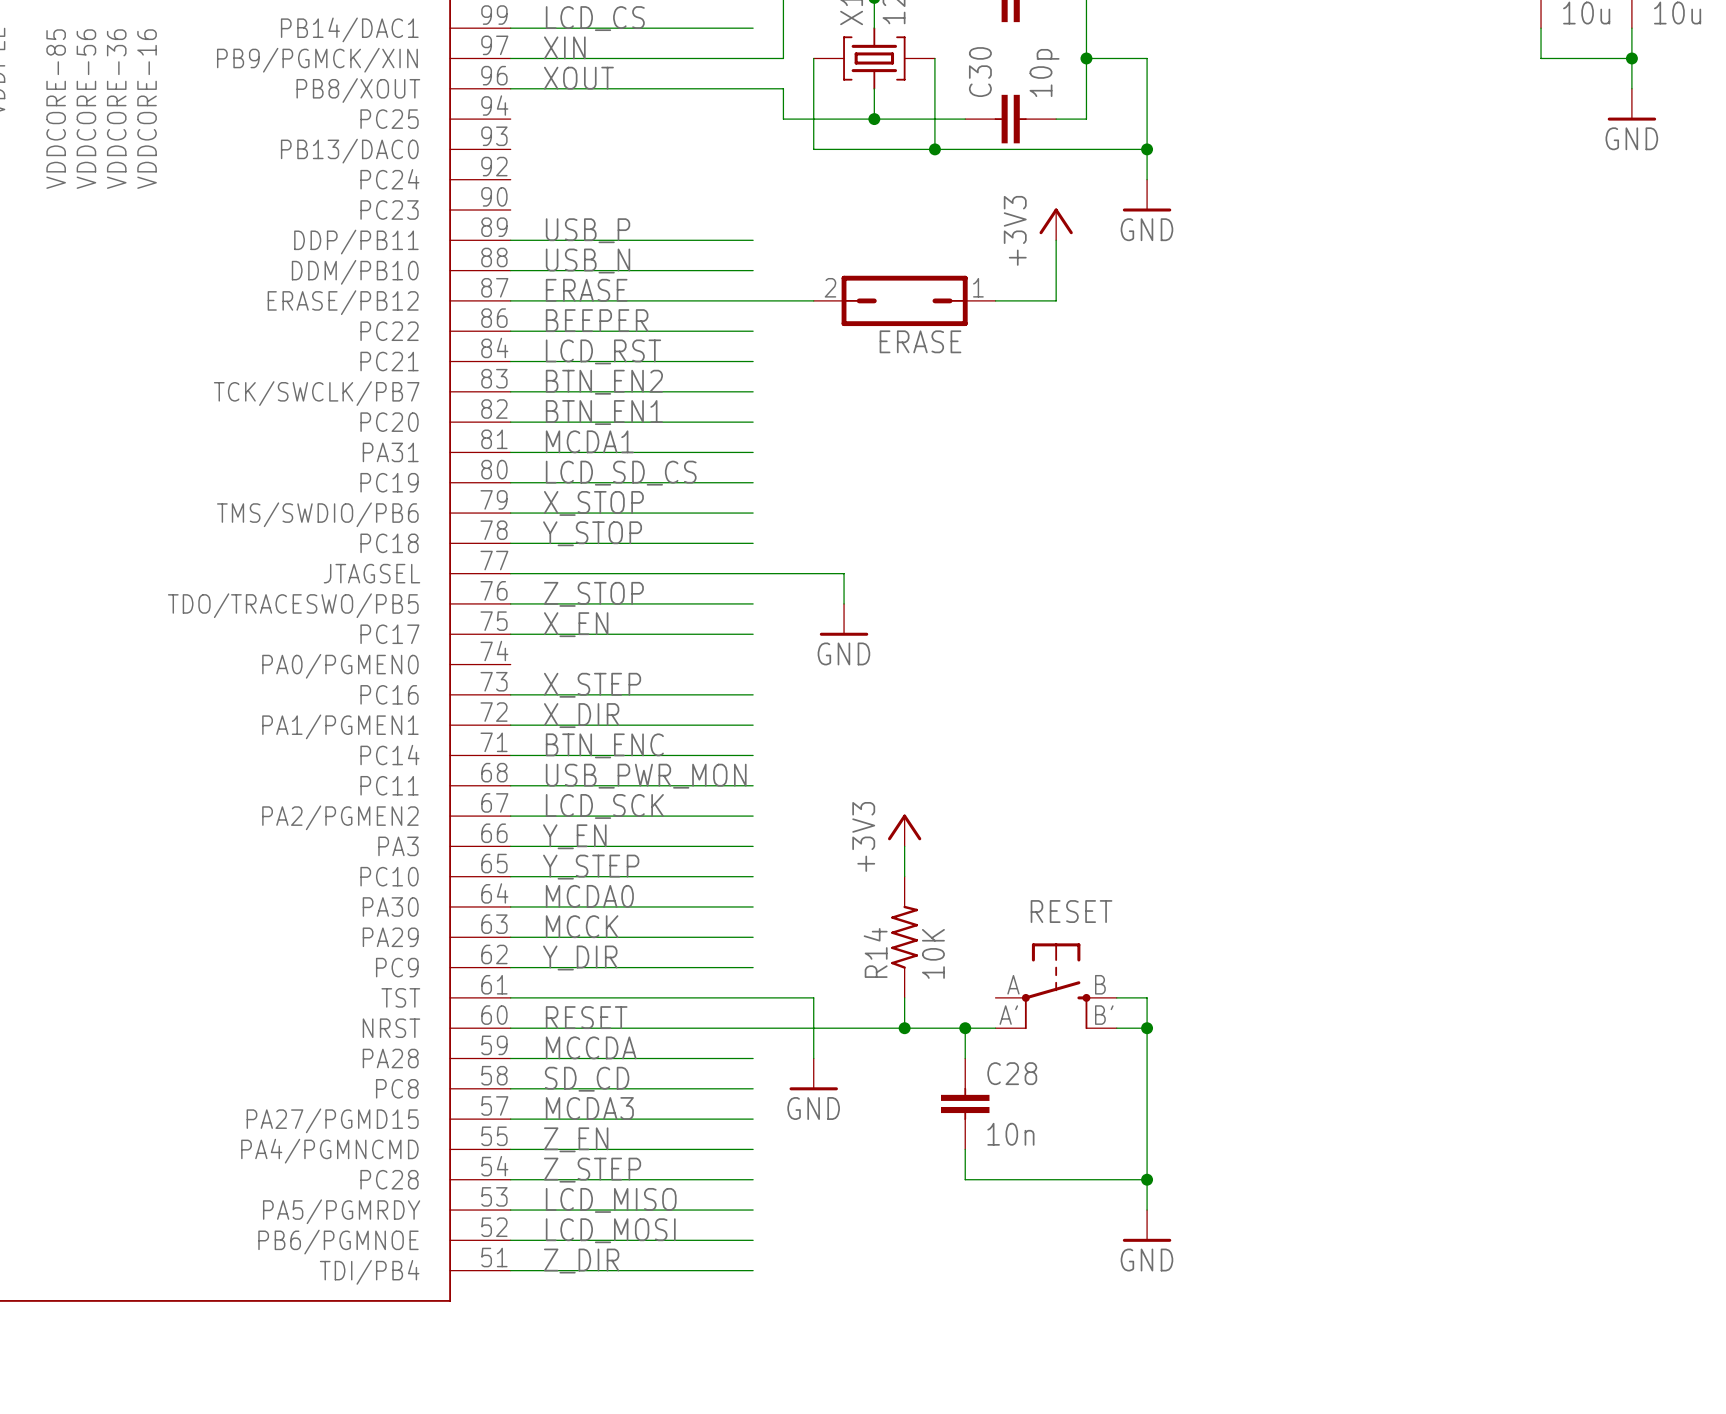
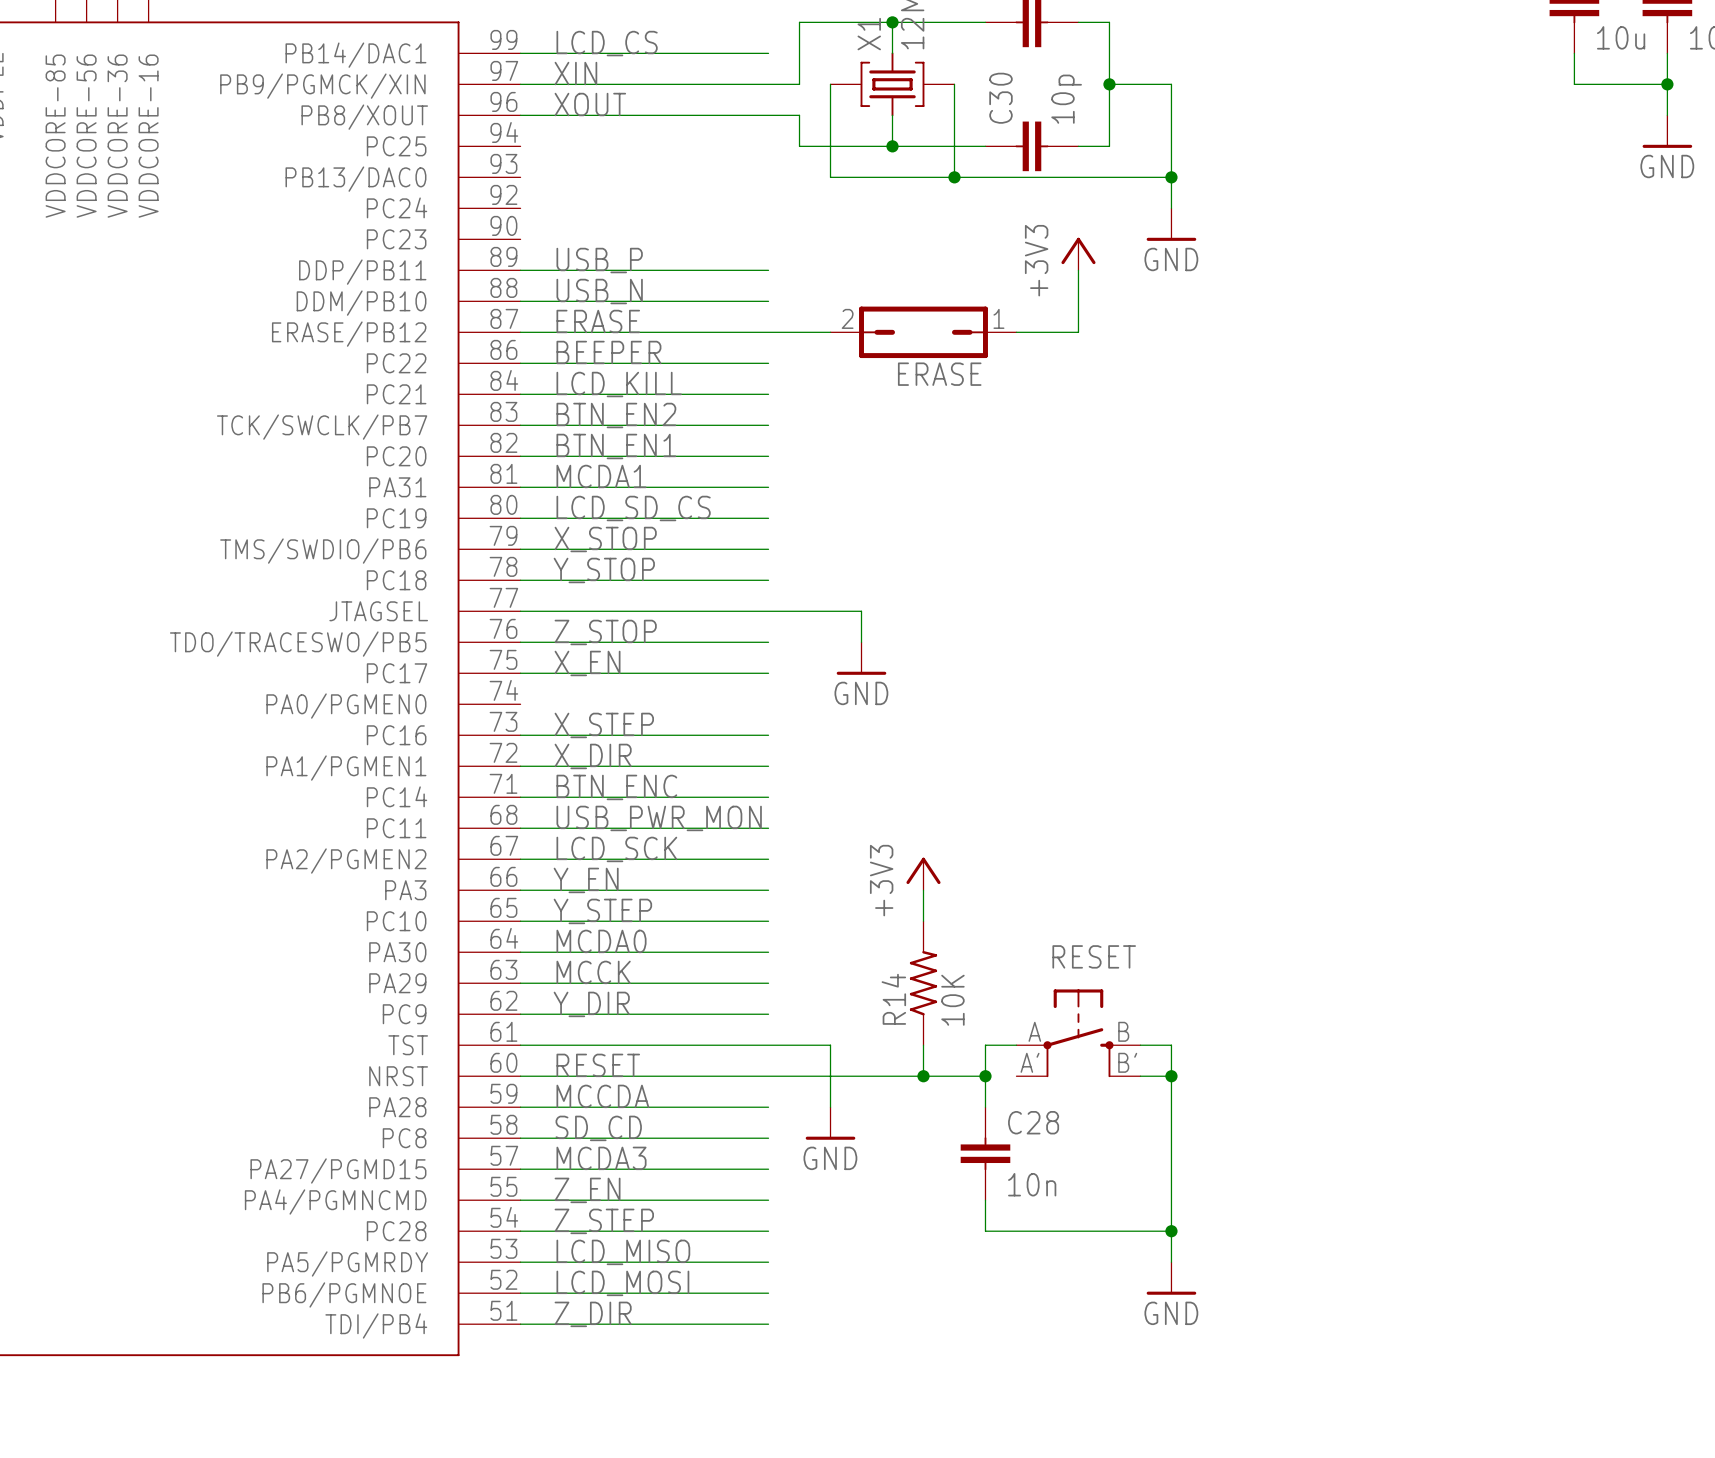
label: LCD_RST (603, 351) -> LCD_KILL (619, 384)
wire: (965, 1028) (995, 1028) -> (985, 1076) (985, 1045) (1016, 1045)

